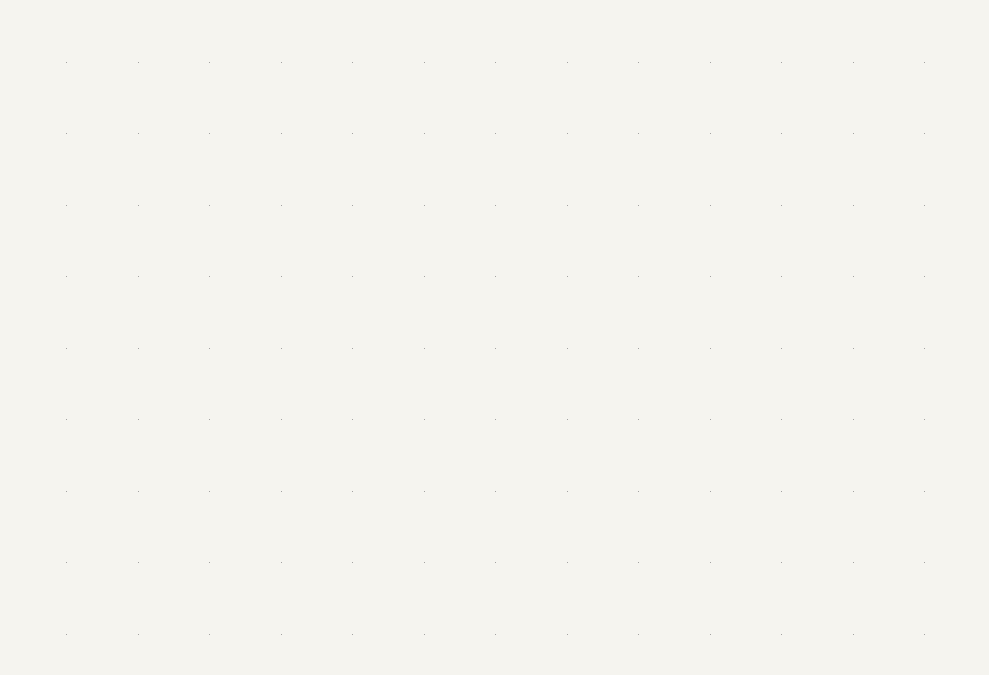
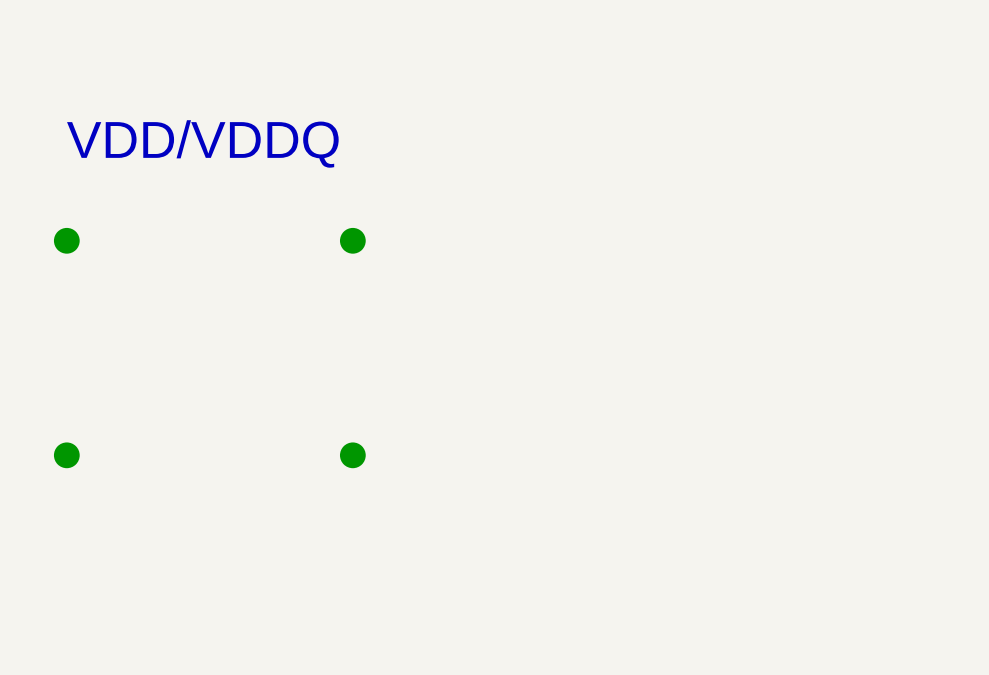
text: none -> VDD/VDDQ (202, 143)
junction: none -> (66, 240)
junction: none -> (352, 240)
junction: none -> (66, 455)
junction: none -> (352, 455)

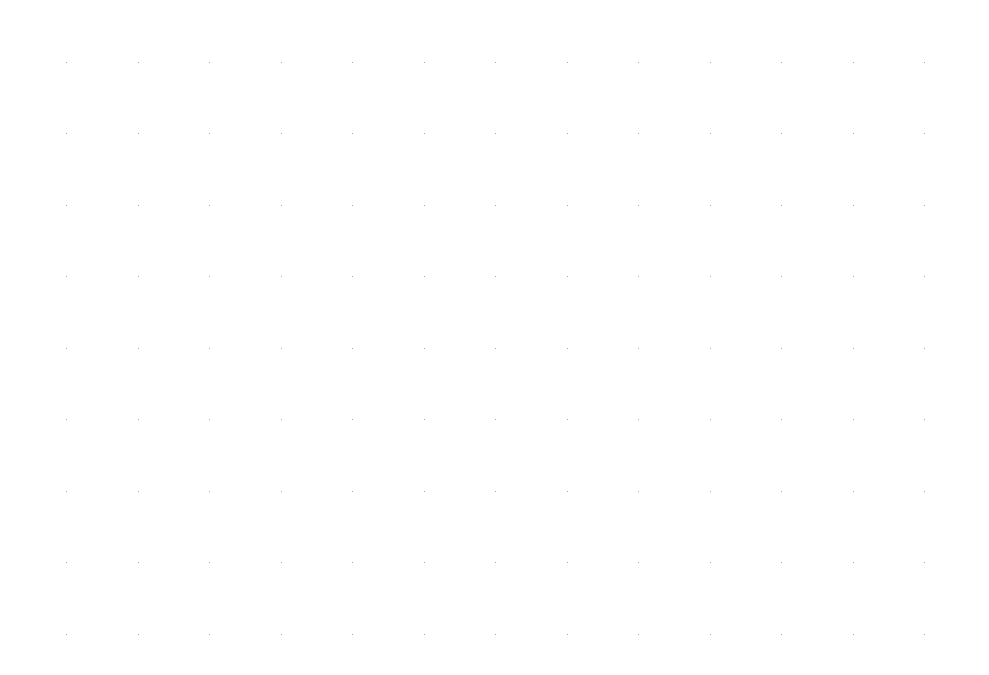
text: VDD/VDDQ (202, 143) -> none
junction: (66, 240) -> none
junction: (352, 240) -> none
junction: (66, 455) -> none
junction: (352, 455) -> none

